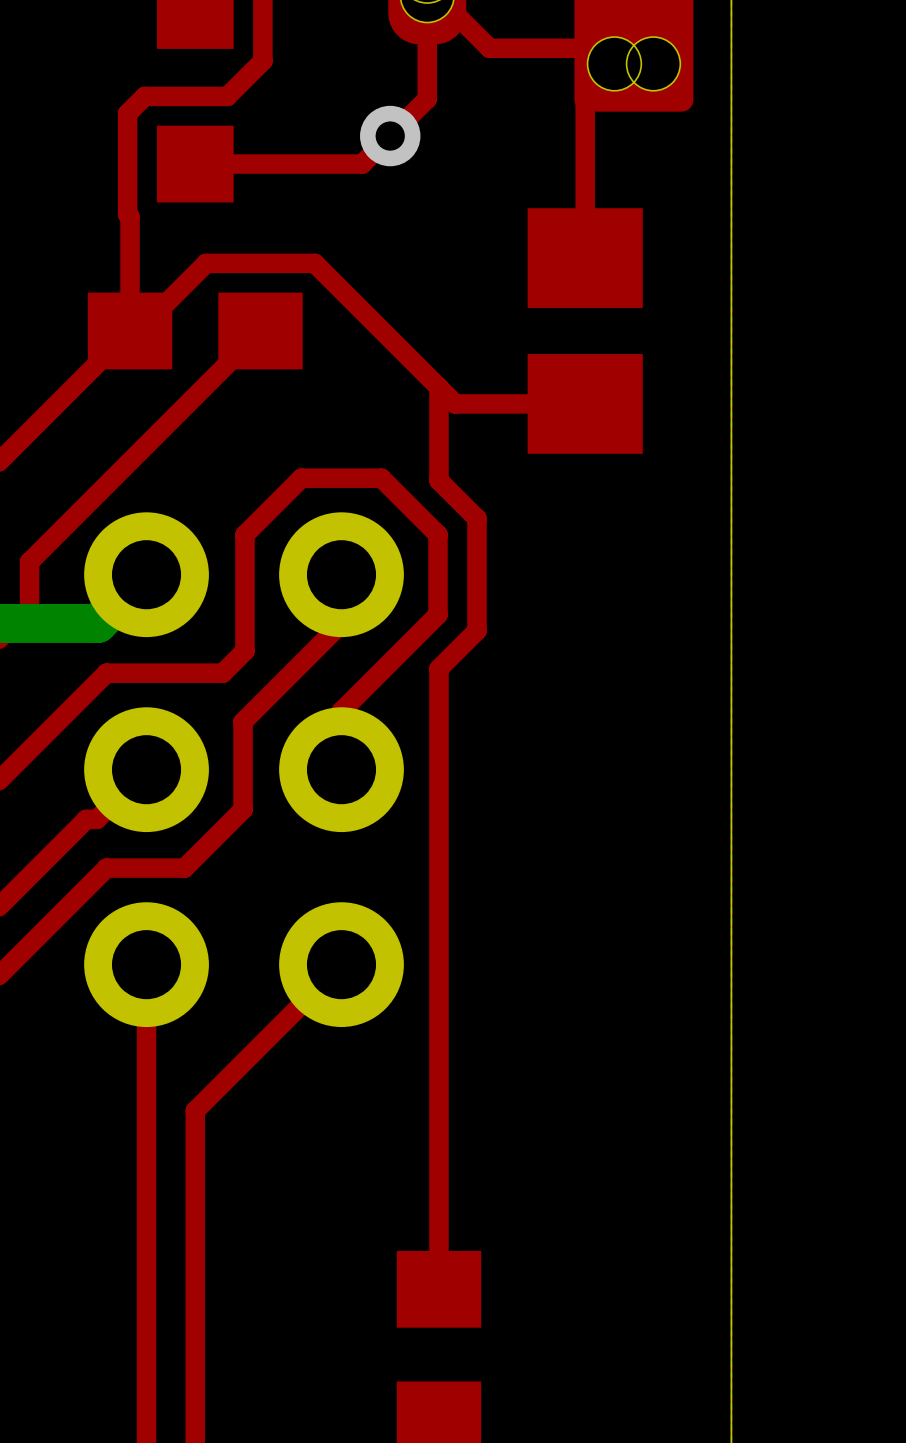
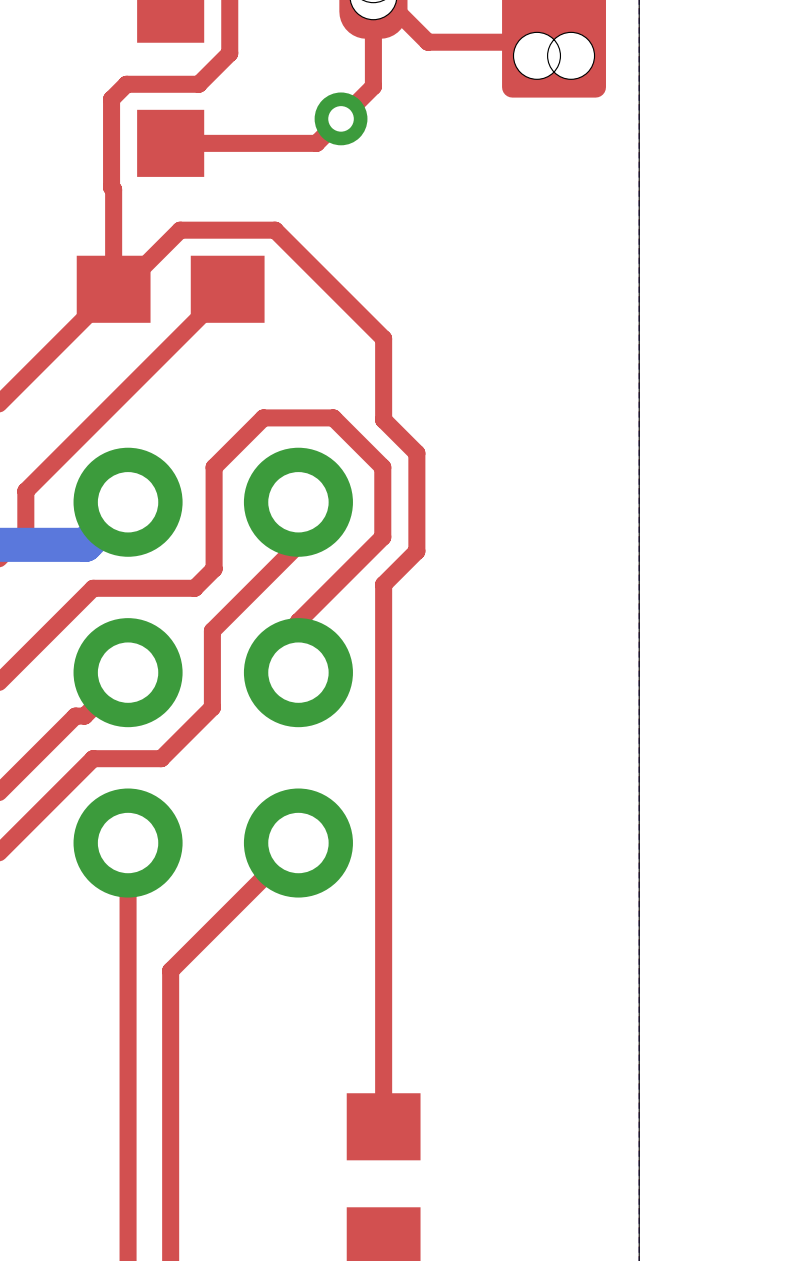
top track: (633, 48) (585, 97) (585, 258) -> none
part: (585, 331) -> none
top track: (438, 387) (455, 403) (585, 403) -> none

